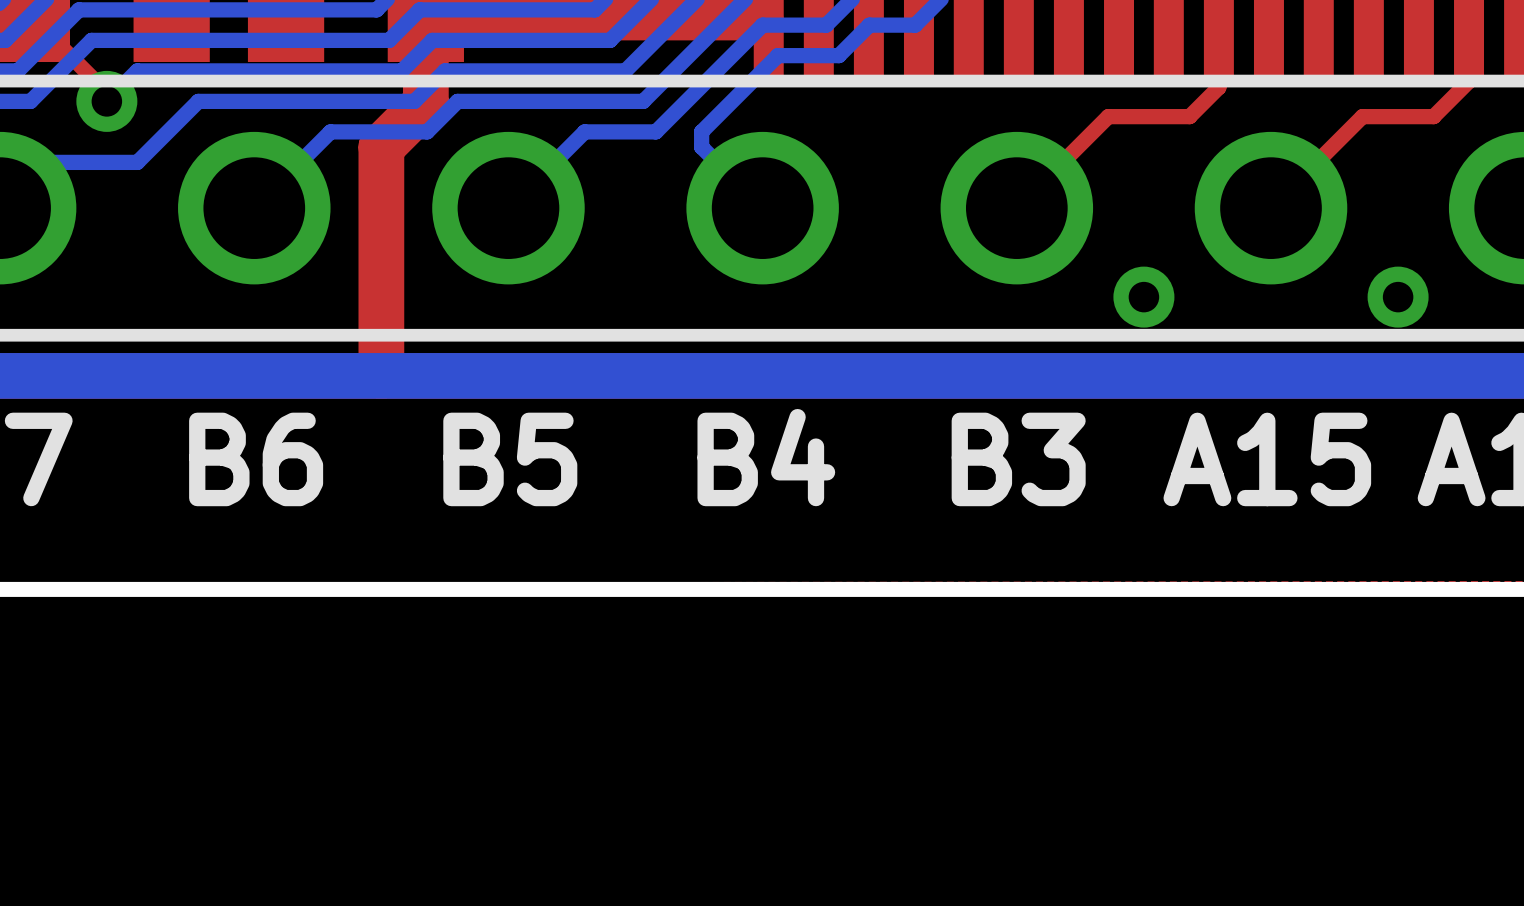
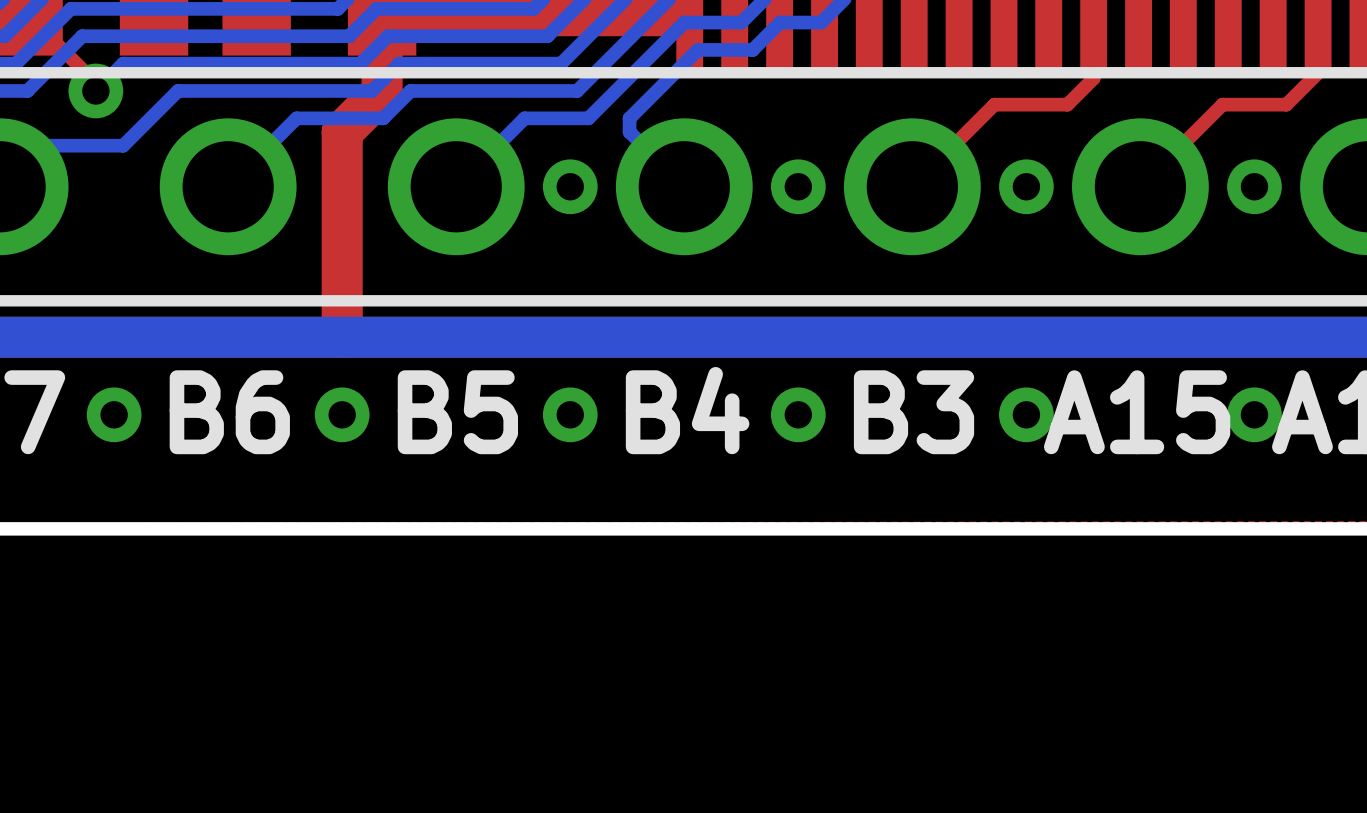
part: none -> (570, 186)
part: none -> (798, 186)
part: none -> (1026, 186)
part: none -> (1254, 186)
via: (1143, 297) -> none
via: (1398, 297) -> none
part: none -> (114, 414)
part: none -> (342, 414)
part: none -> (570, 414)
part: none -> (798, 414)
part: none -> (1026, 414)
part: none -> (1254, 414)

